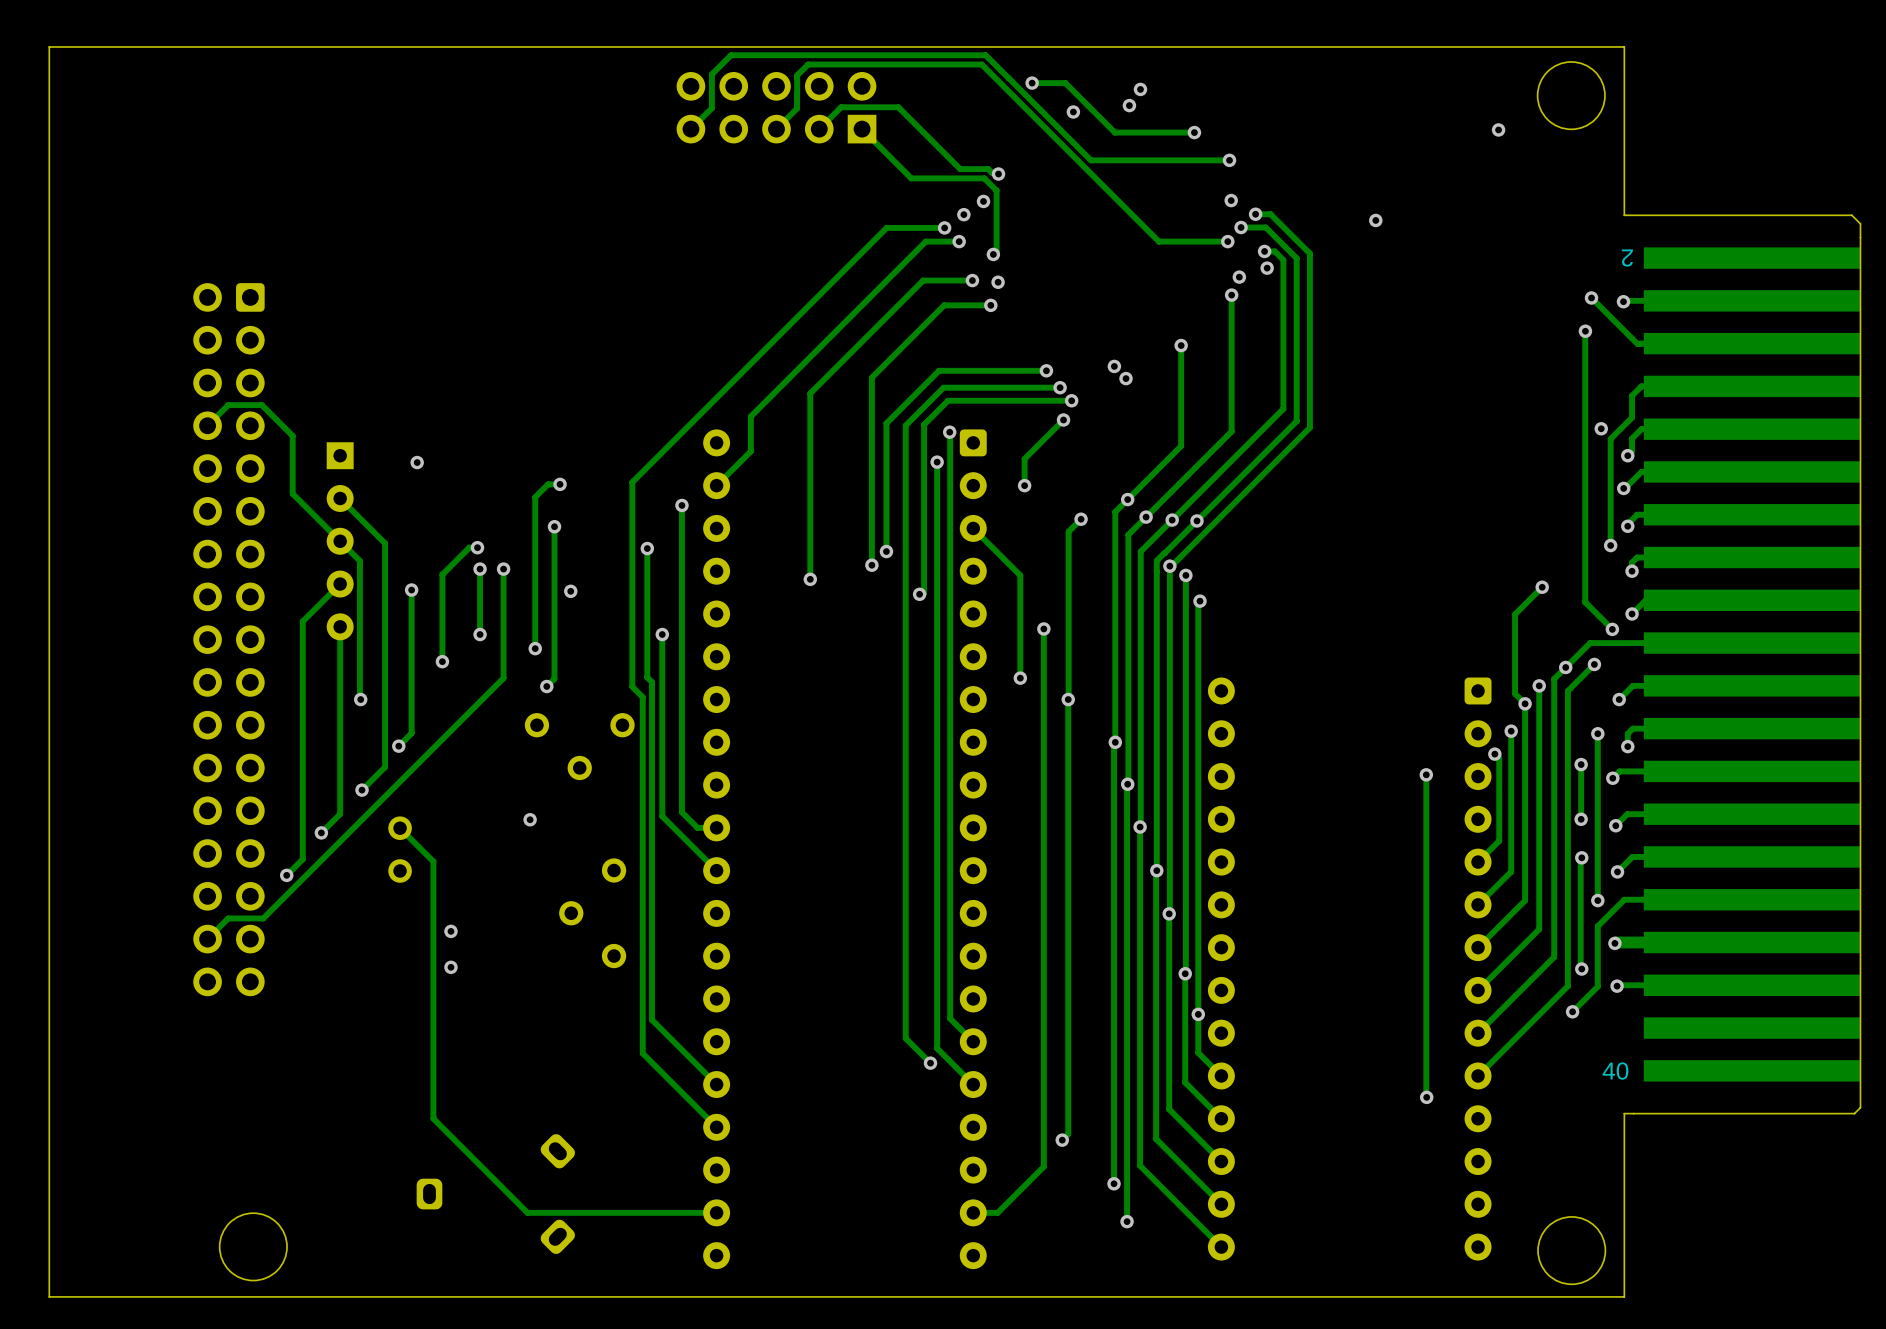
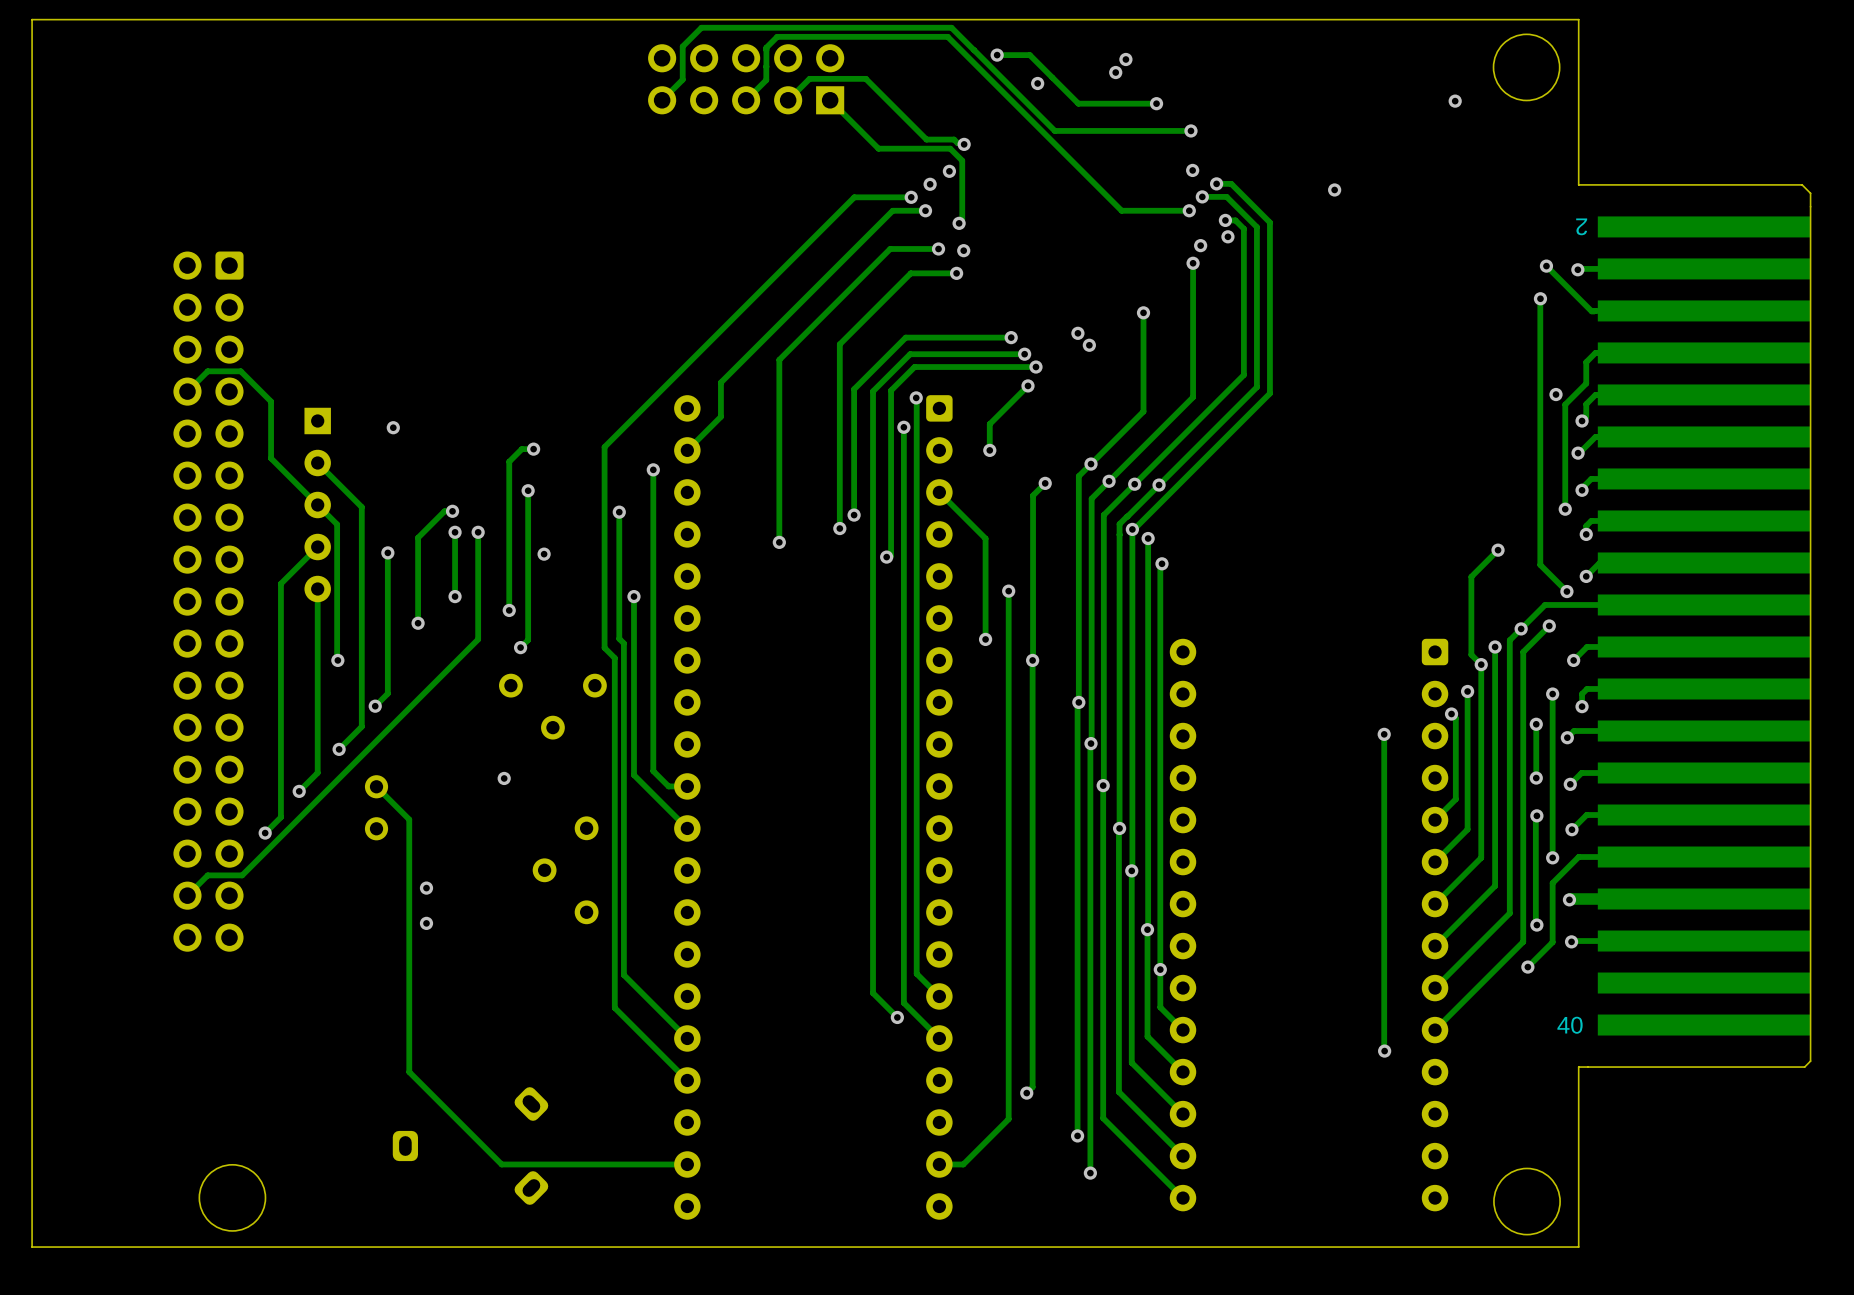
via: none -> (1125, 59)
via: (1140, 89) -> none
via: none -> (1115, 72)
via: (1129, 105) -> none

